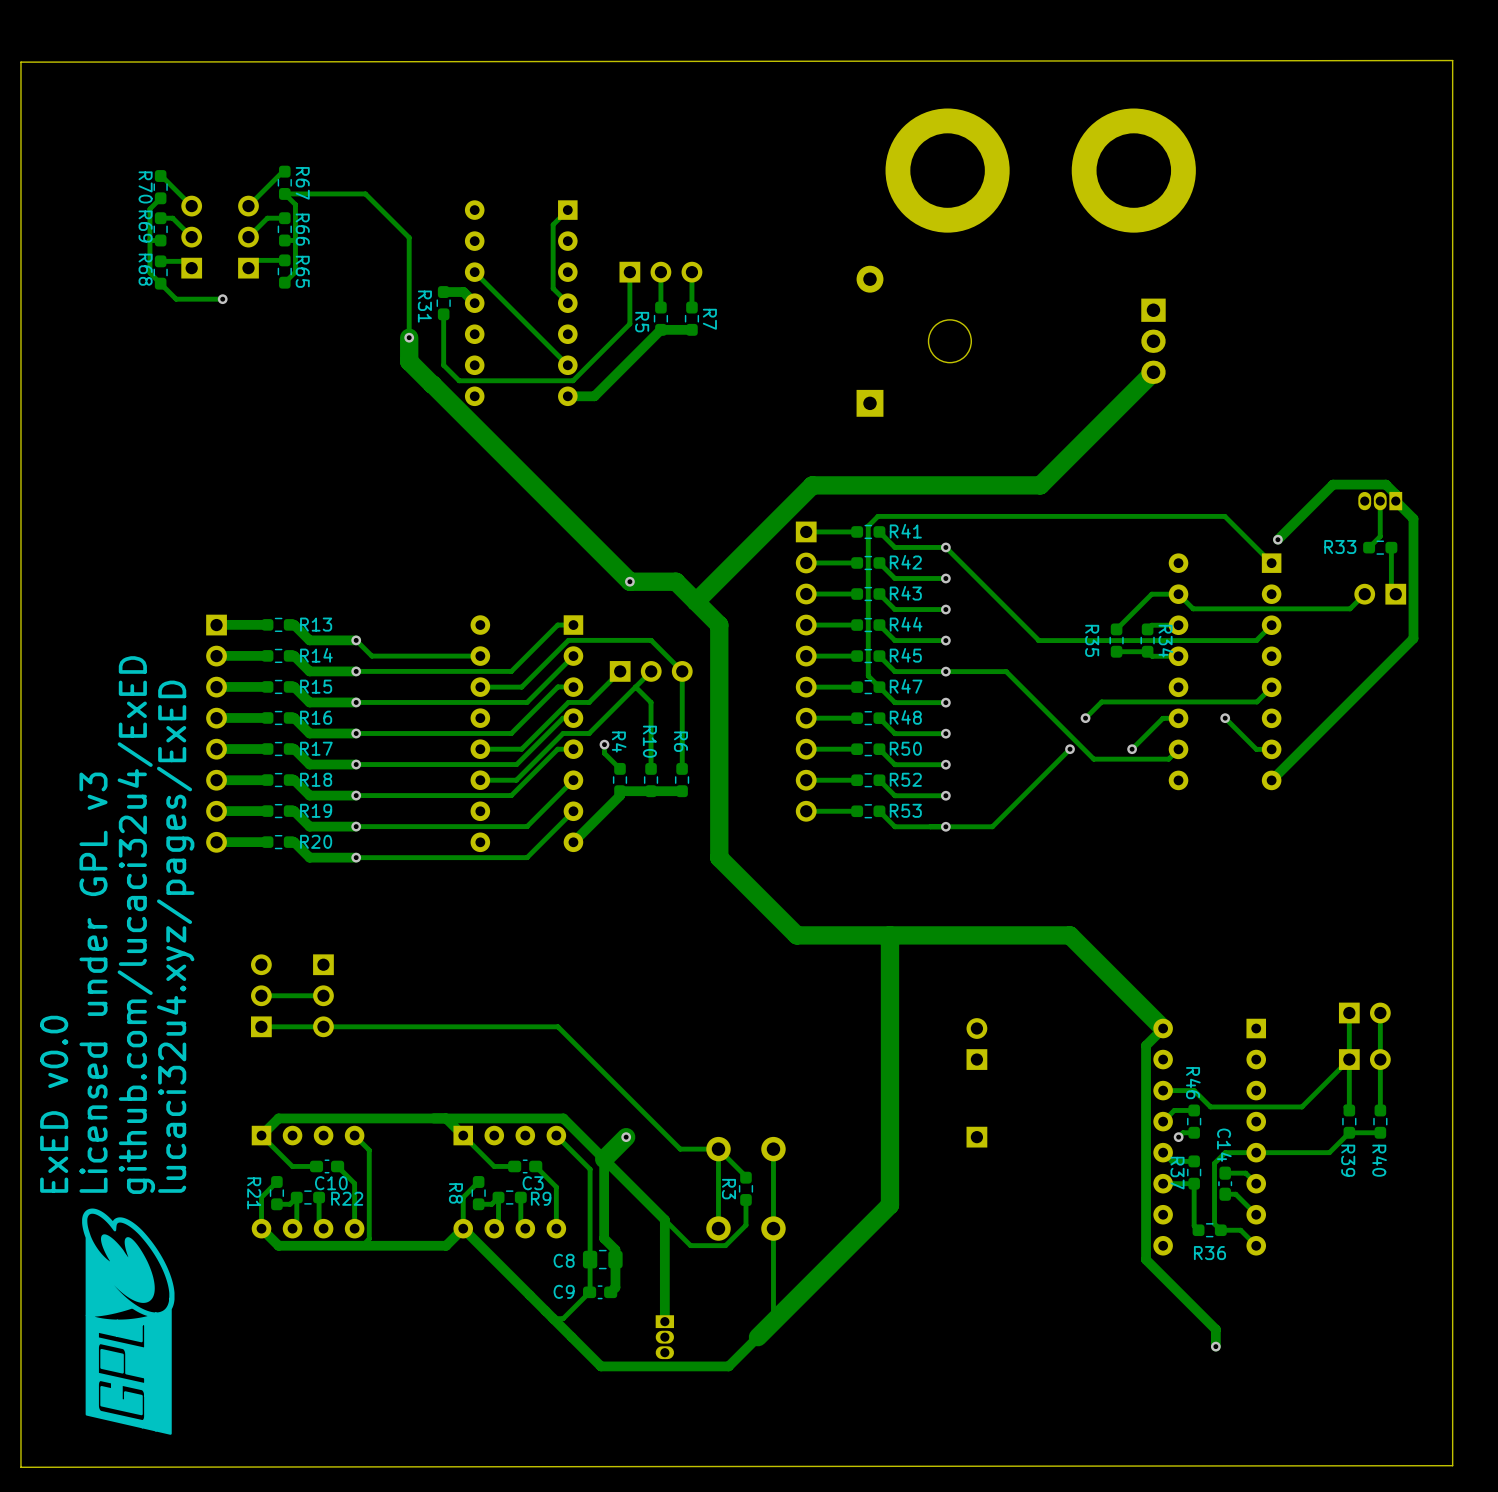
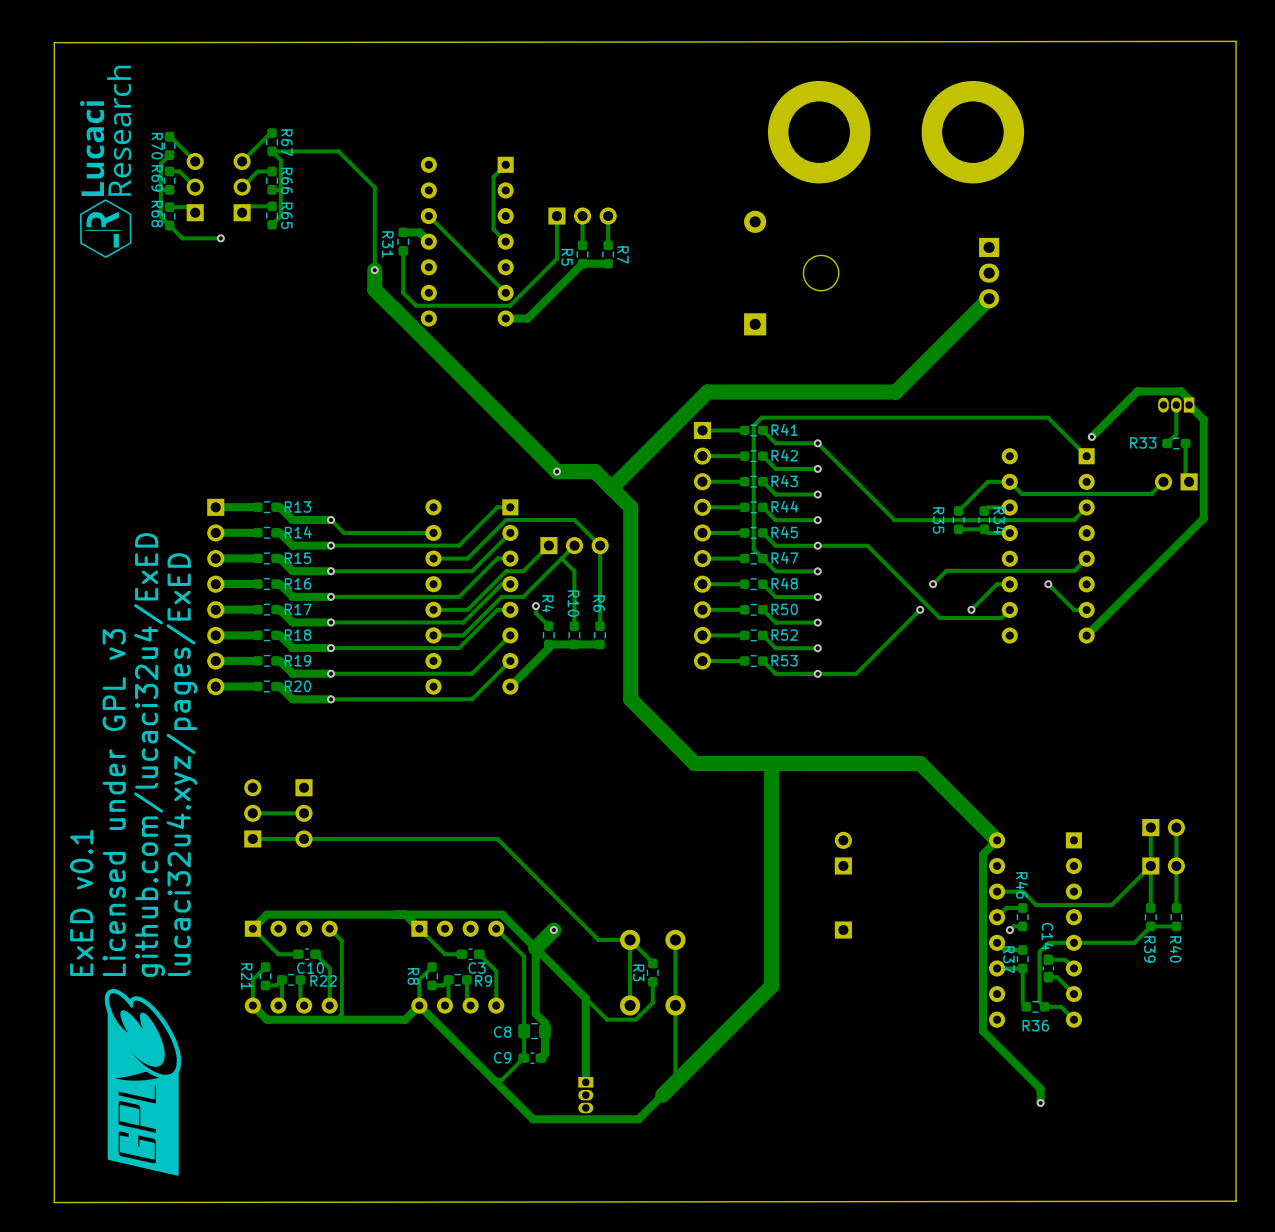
drawing: none -> [79, 65, 132, 259]
text: ExED v0.0 (54, 1104) -> ExED v0.1 (81, 902)

